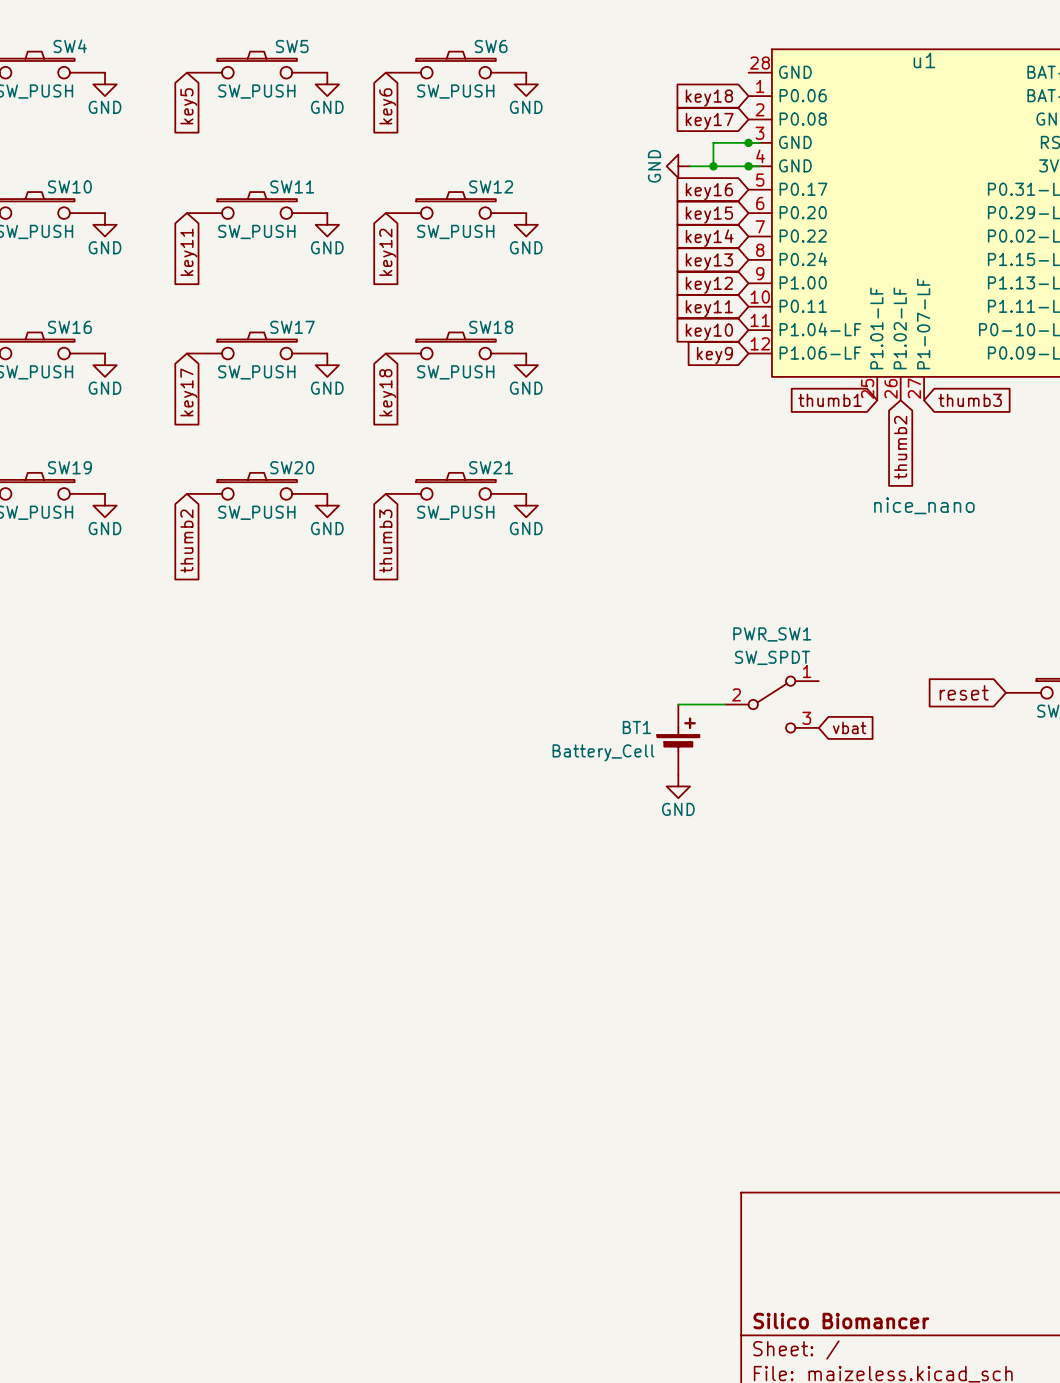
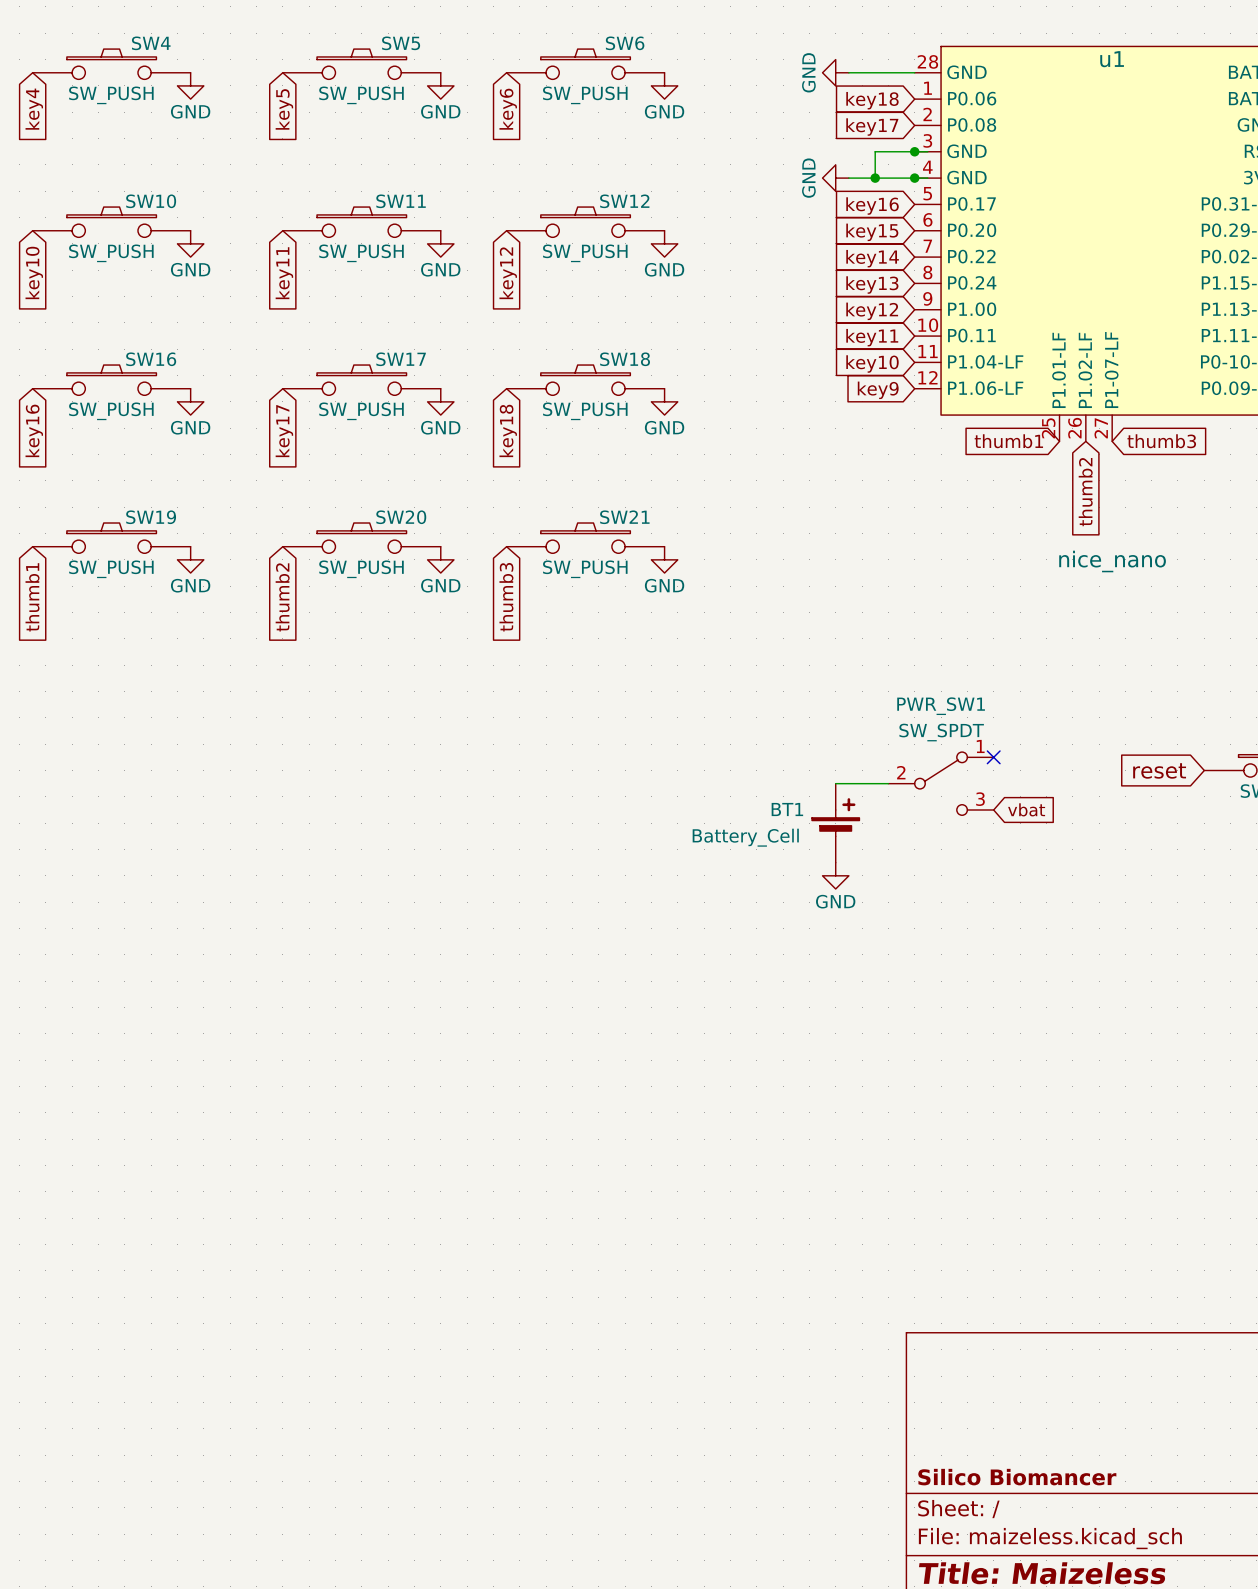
power symbol: none -> GND (835, 72)
wire: none -> (848, 72) (914, 72)
no-connect mark: none -> (993, 757)

